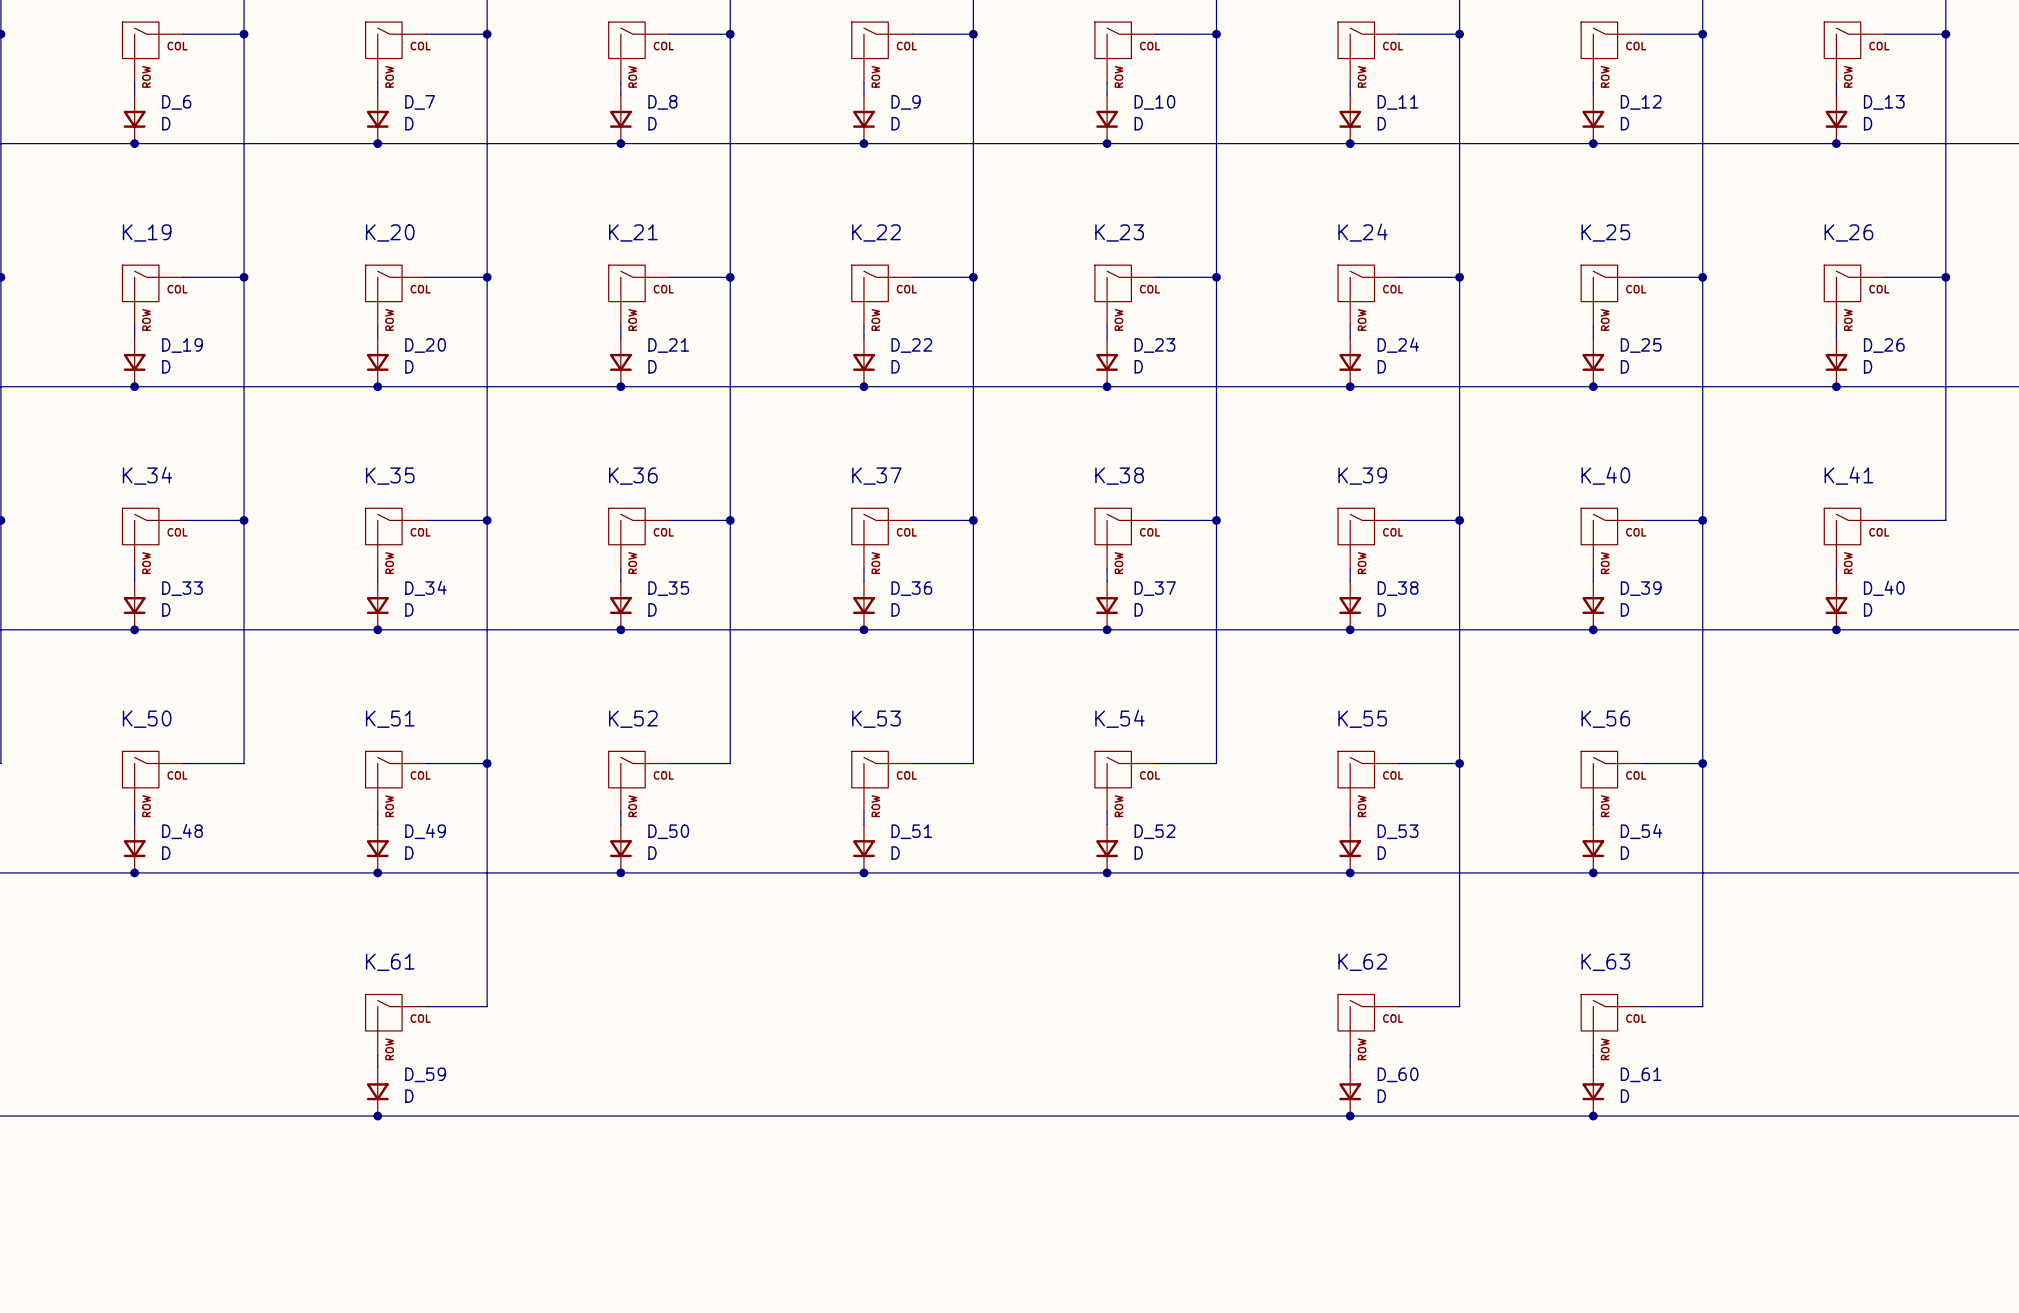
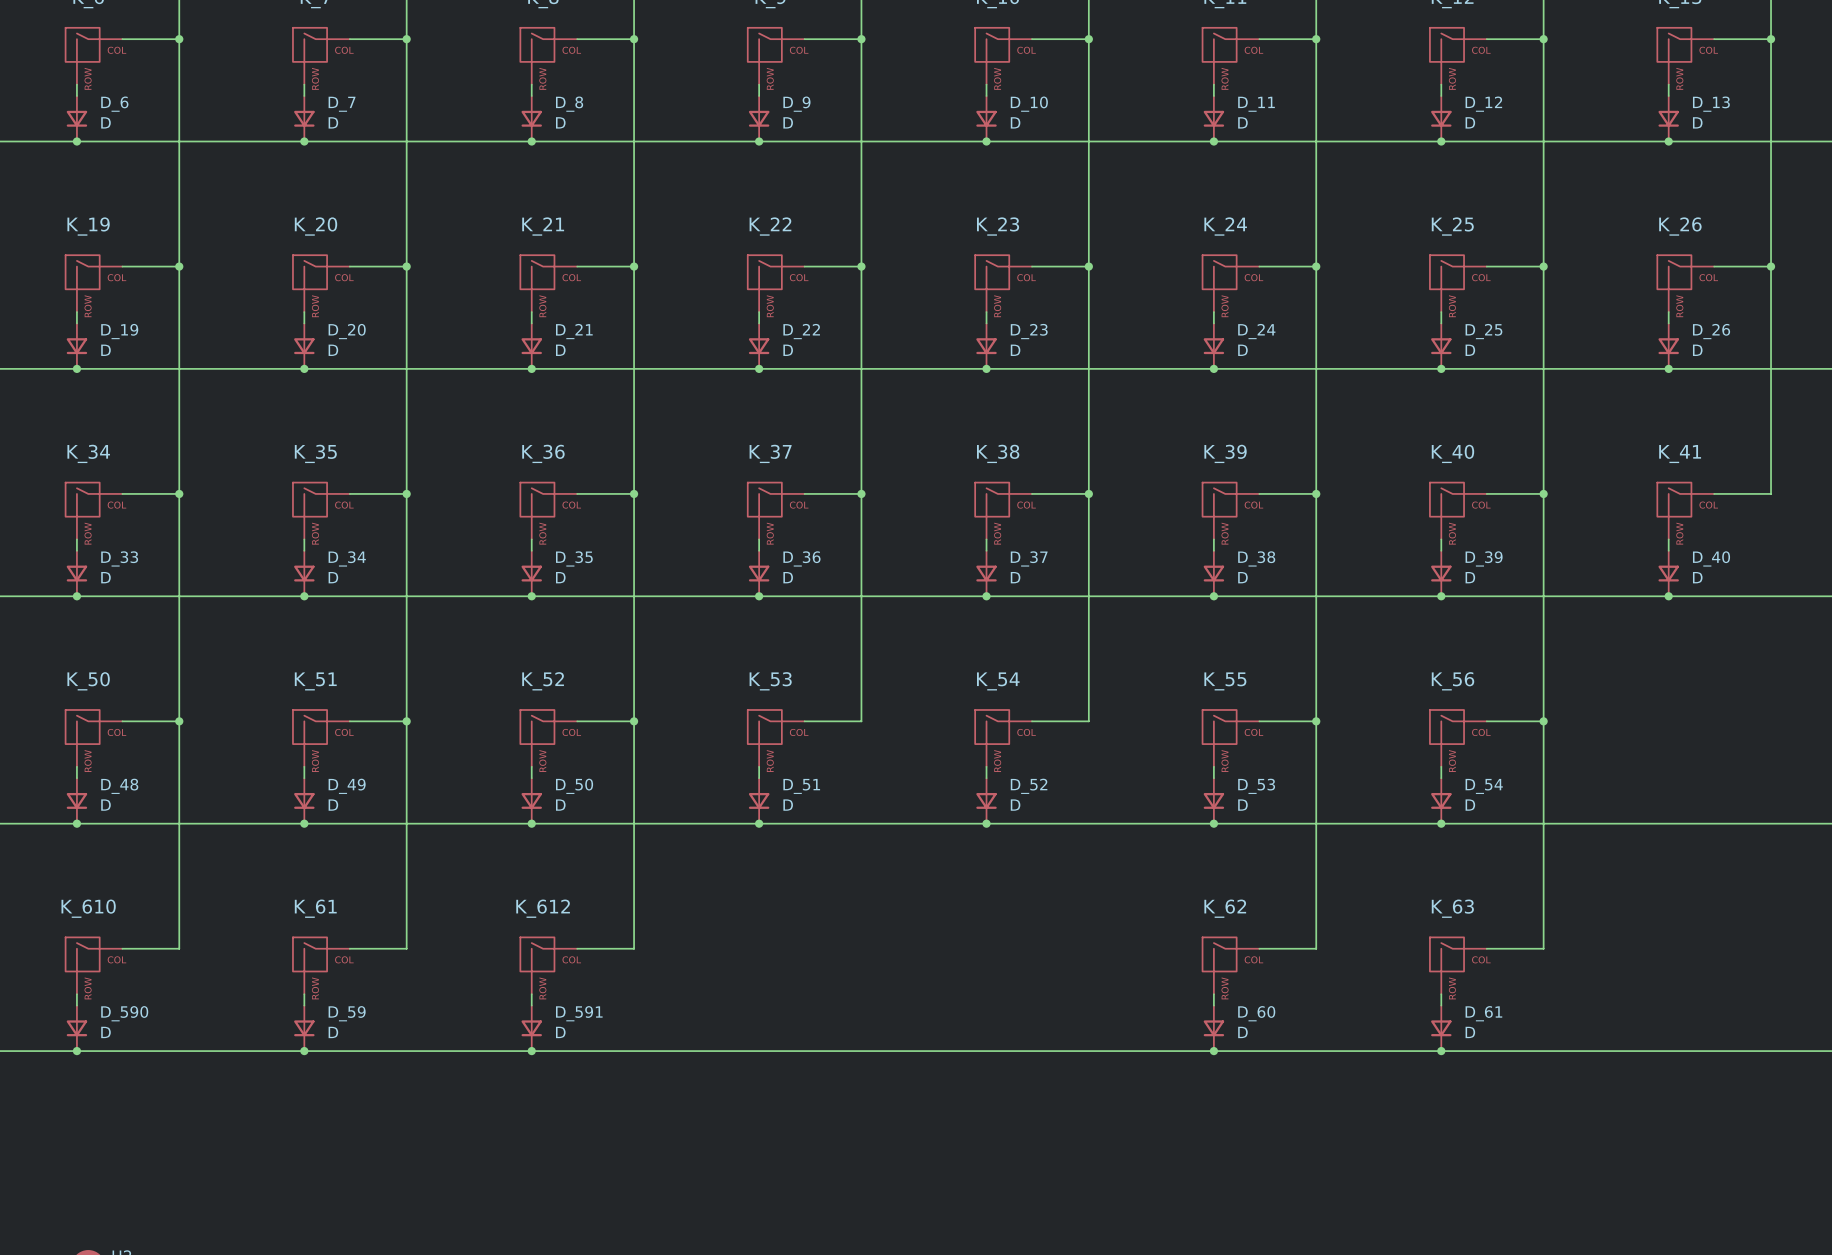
wire: none -> (179, 721) (179, 948) (122, 948)
junction: none -> (179, 721)
wire: none -> (634, 721) (634, 948) (577, 948)
junction: none -> (634, 721)
K_610: none -> (94, 965)
K_612: none -> (548, 965)
wire: none -> (76, 994) (76, 1005)
wire: none -> (531, 994) (531, 1005)
D_590: none -> D (76, 1028)
D_591: none -> D (531, 1028)
junction: none -> (76, 1051)
junction: none -> (531, 1051)

